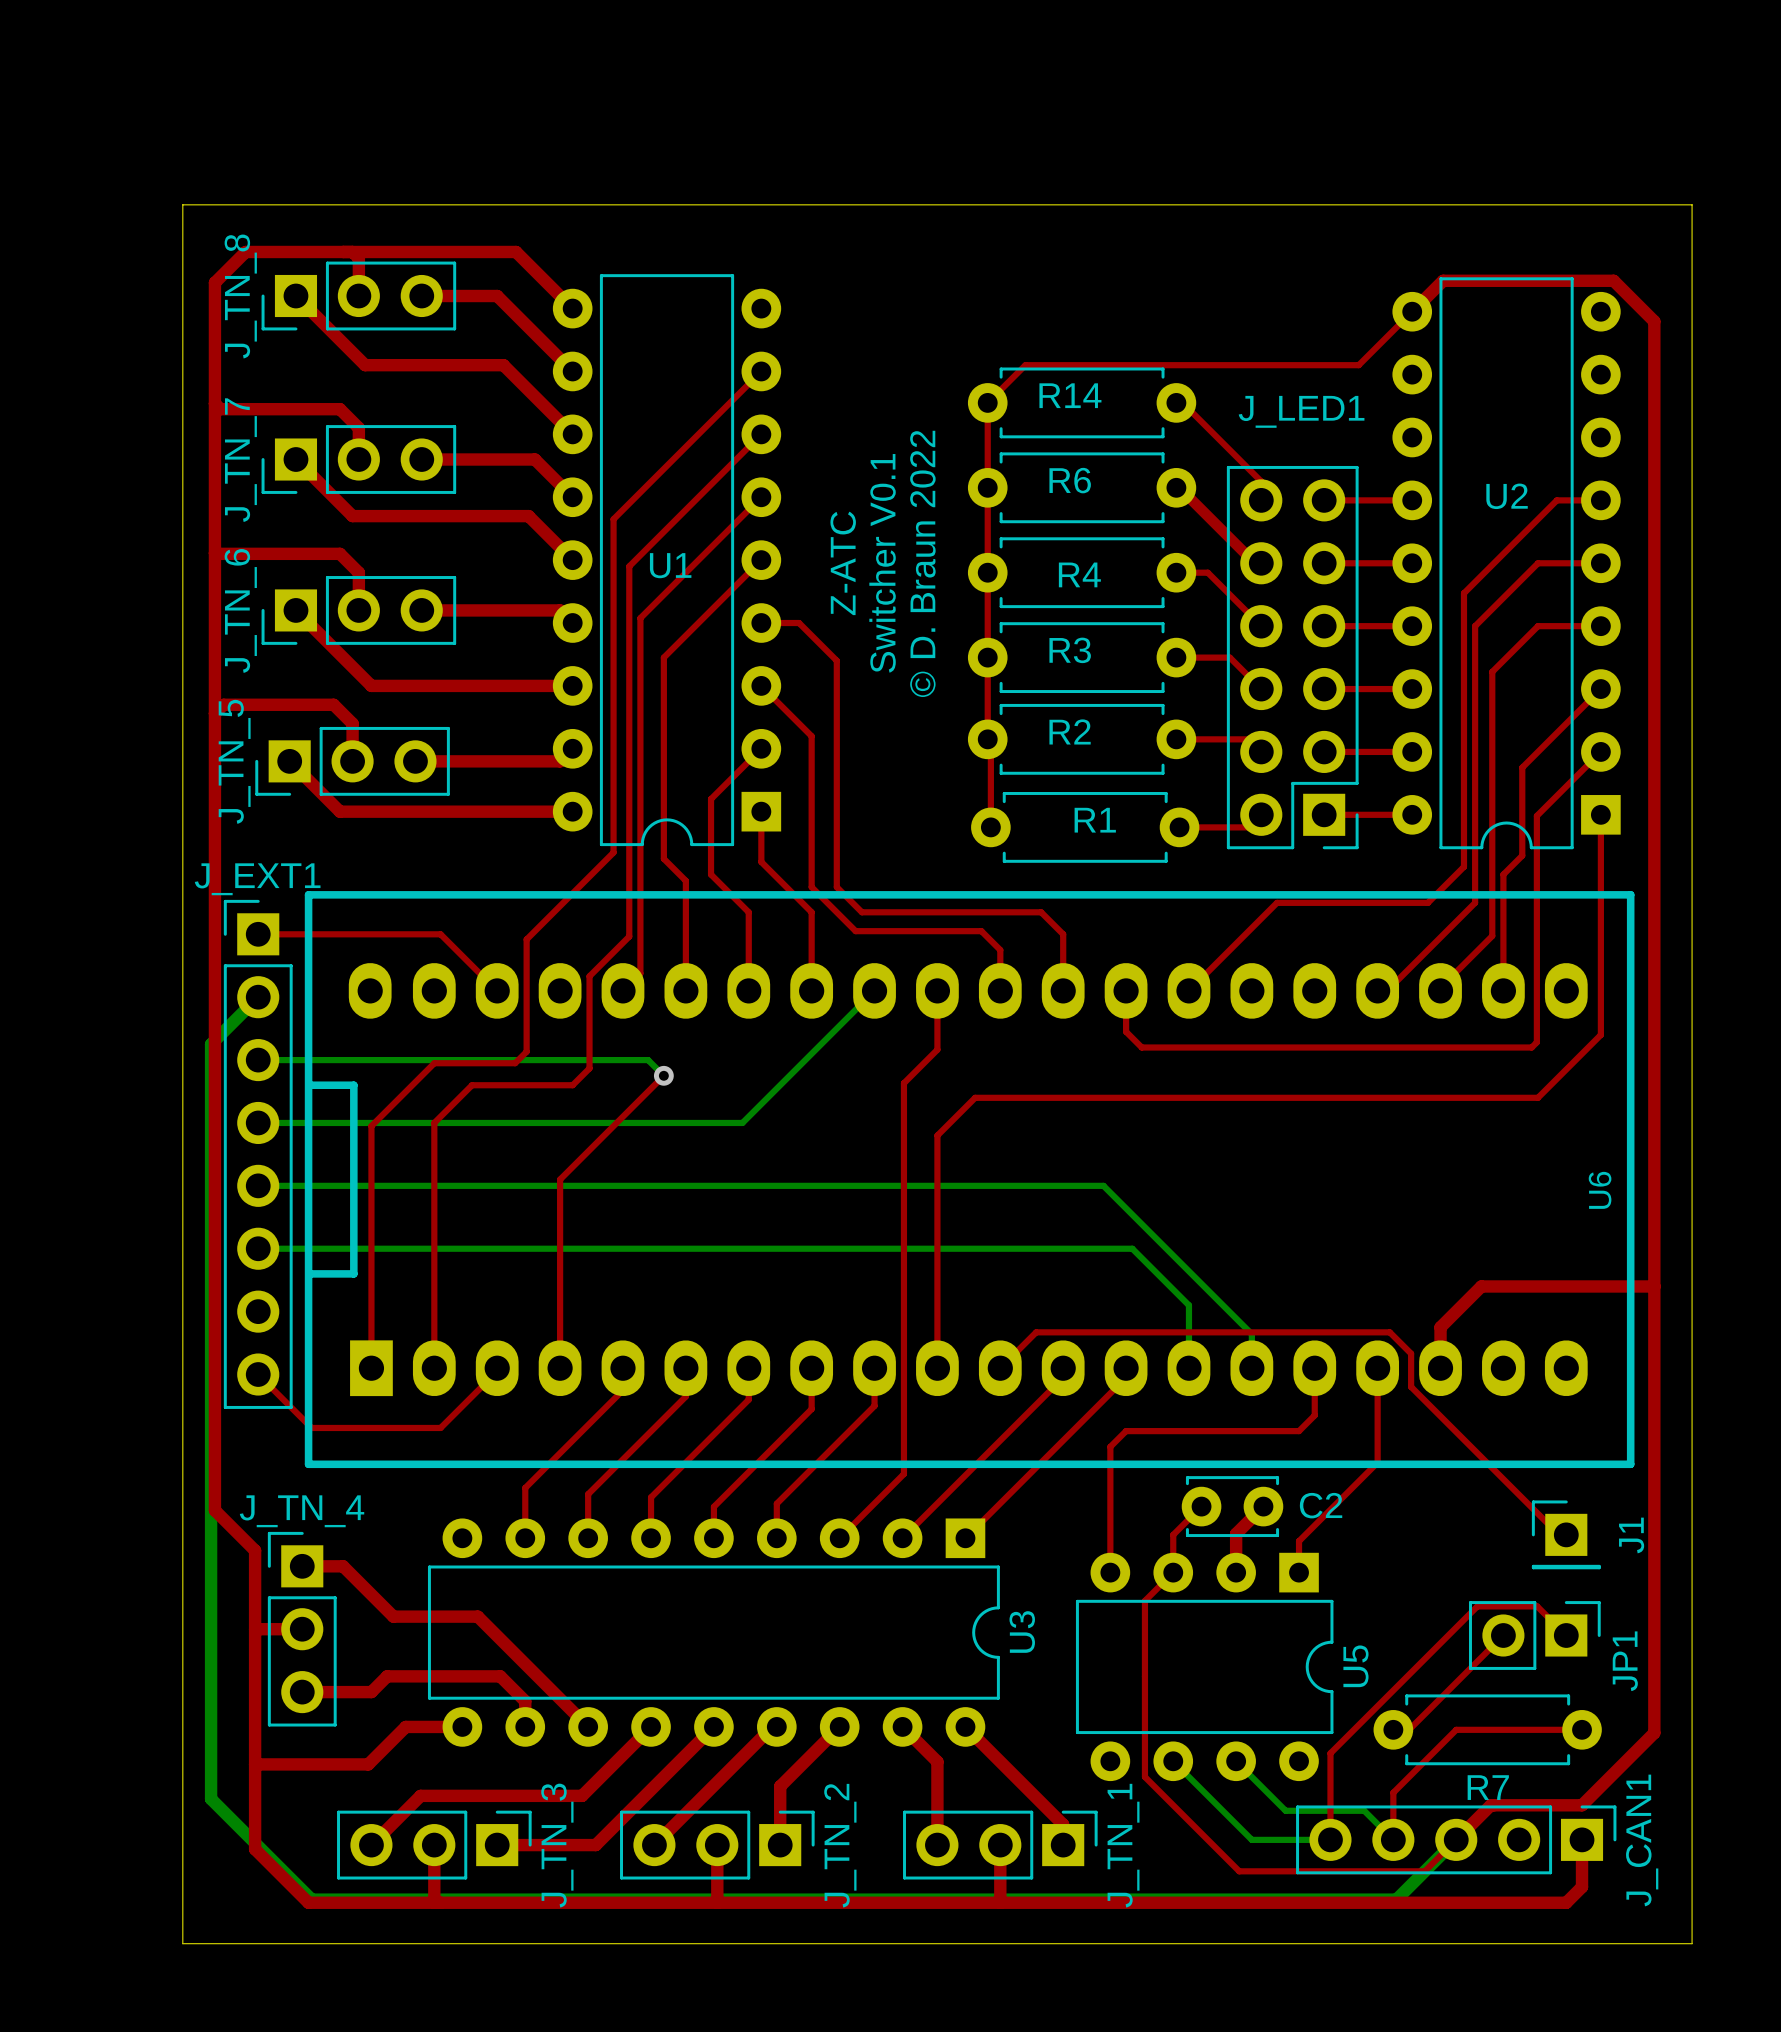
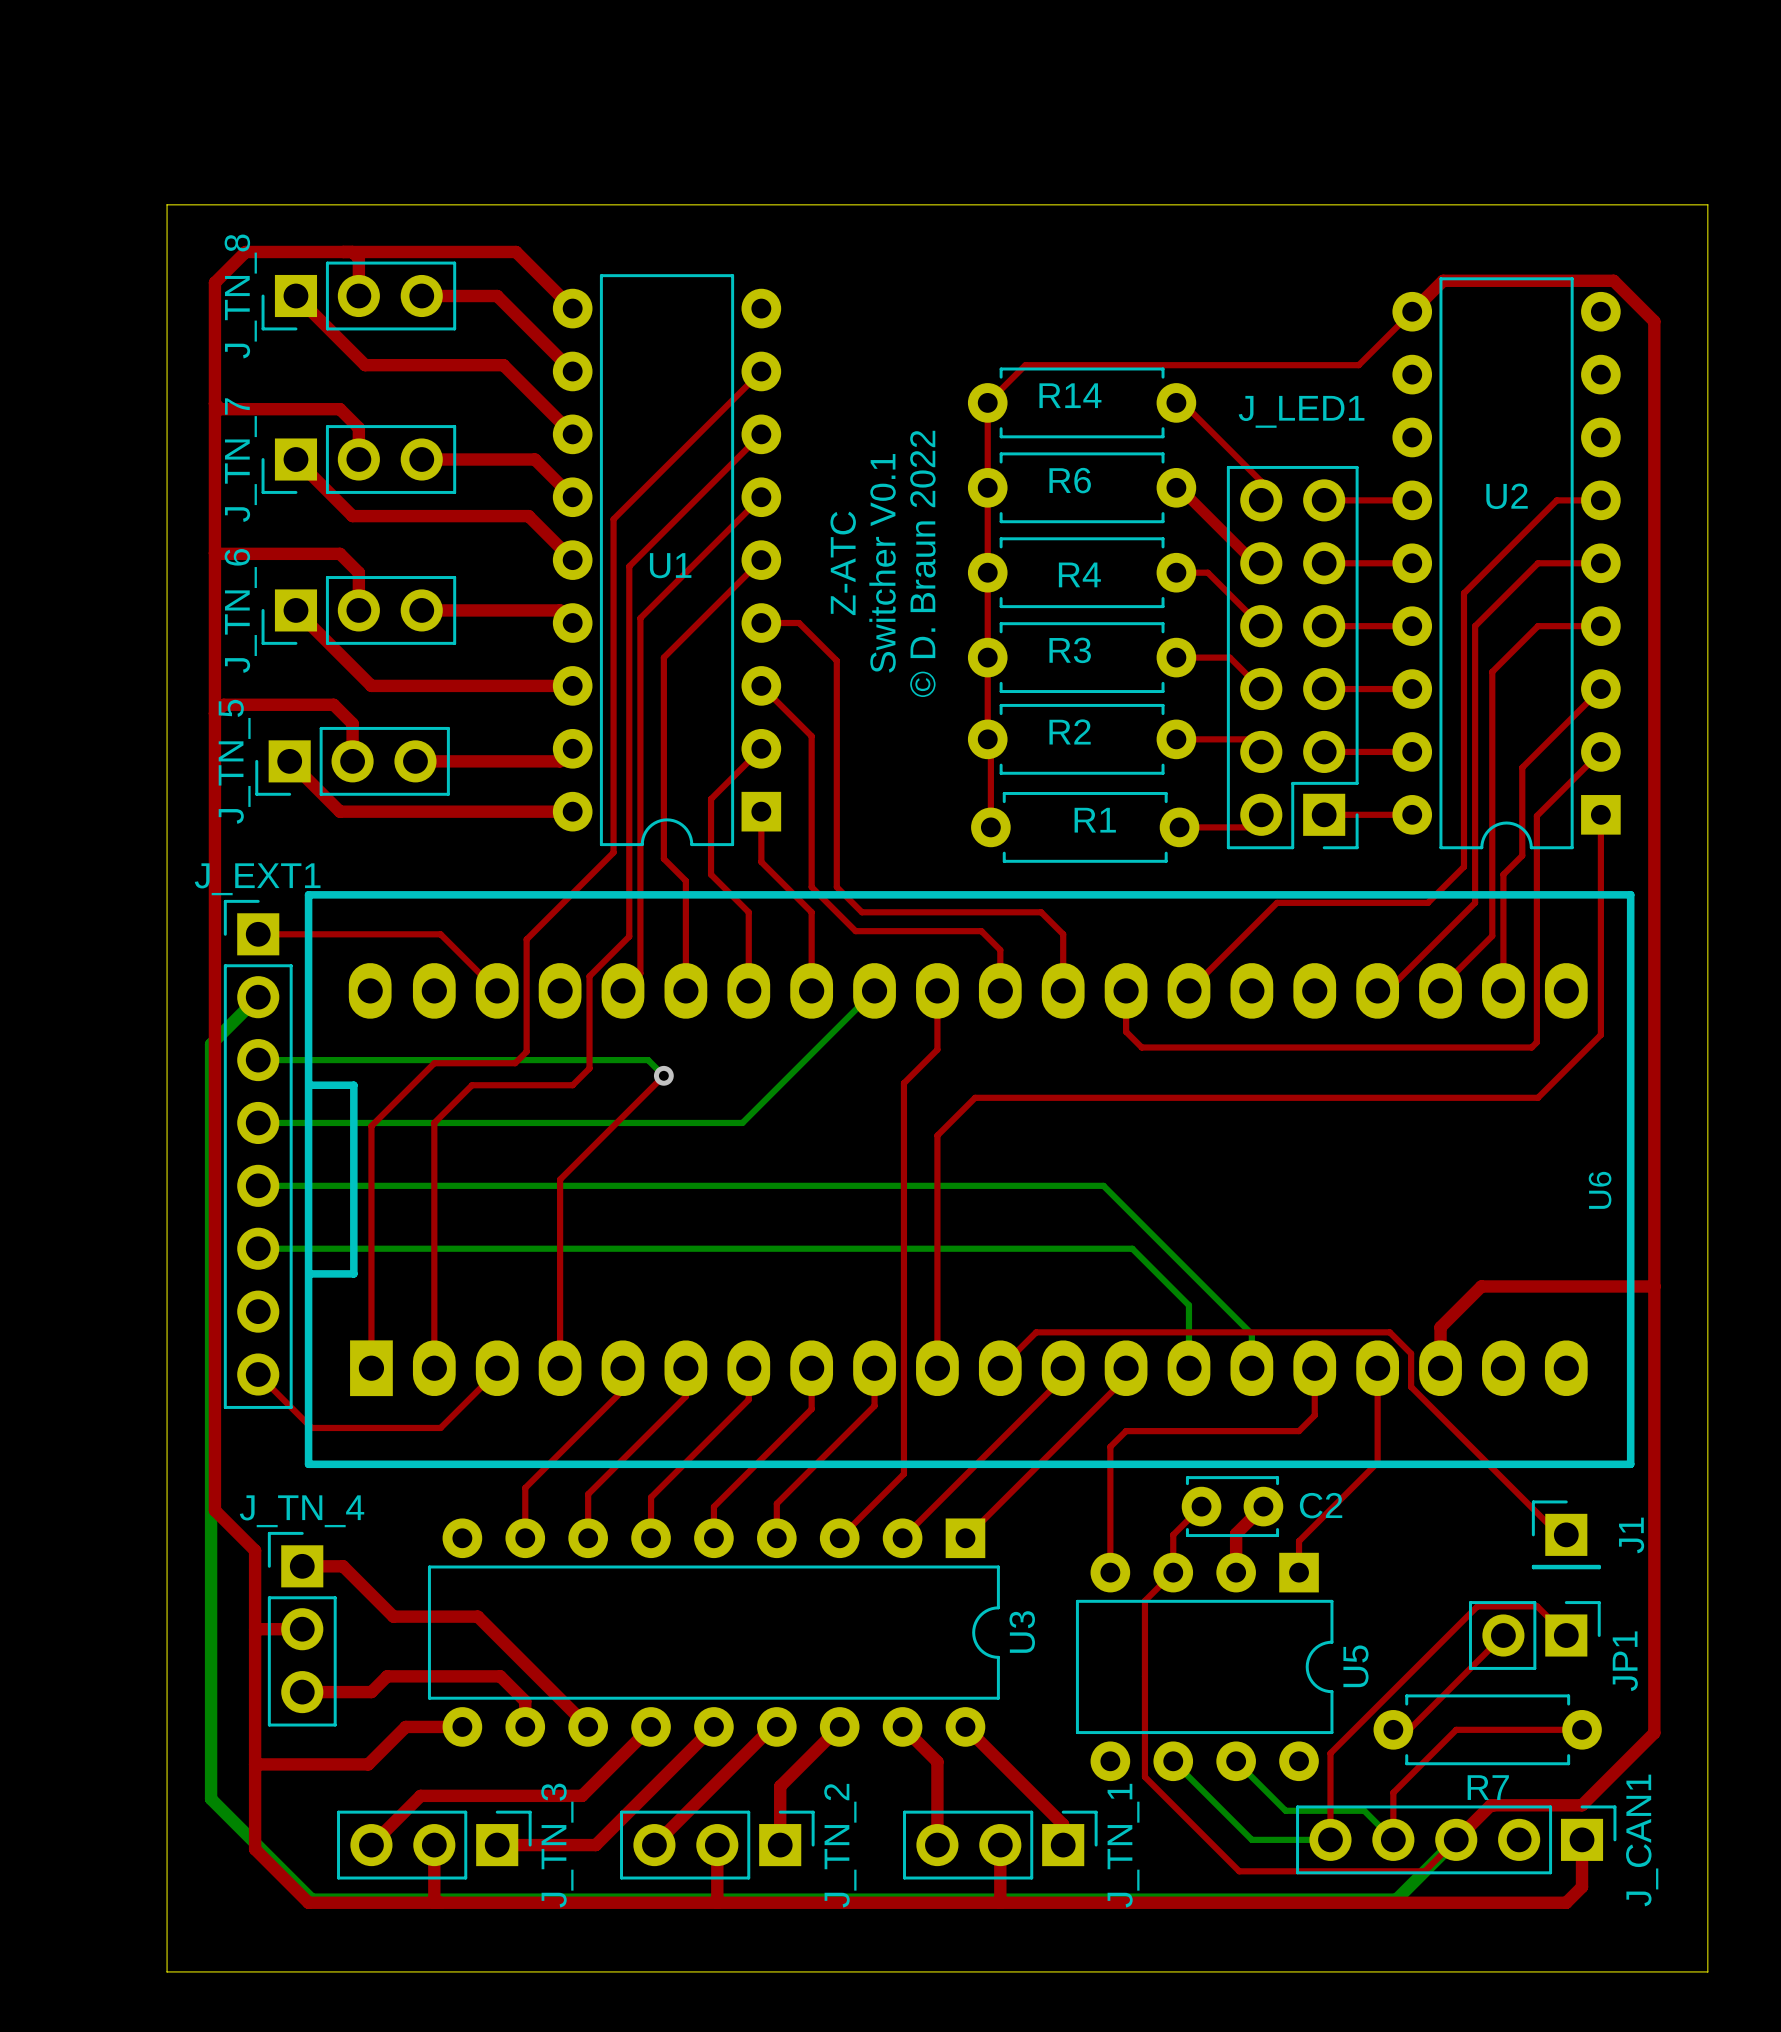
board edge: (182, 204) (182, 1943) (1692, 1943) (1692, 204) -> (182, 204) (167, 204) (167, 1971) (1707, 1971) (1707, 204) (1692, 204)

